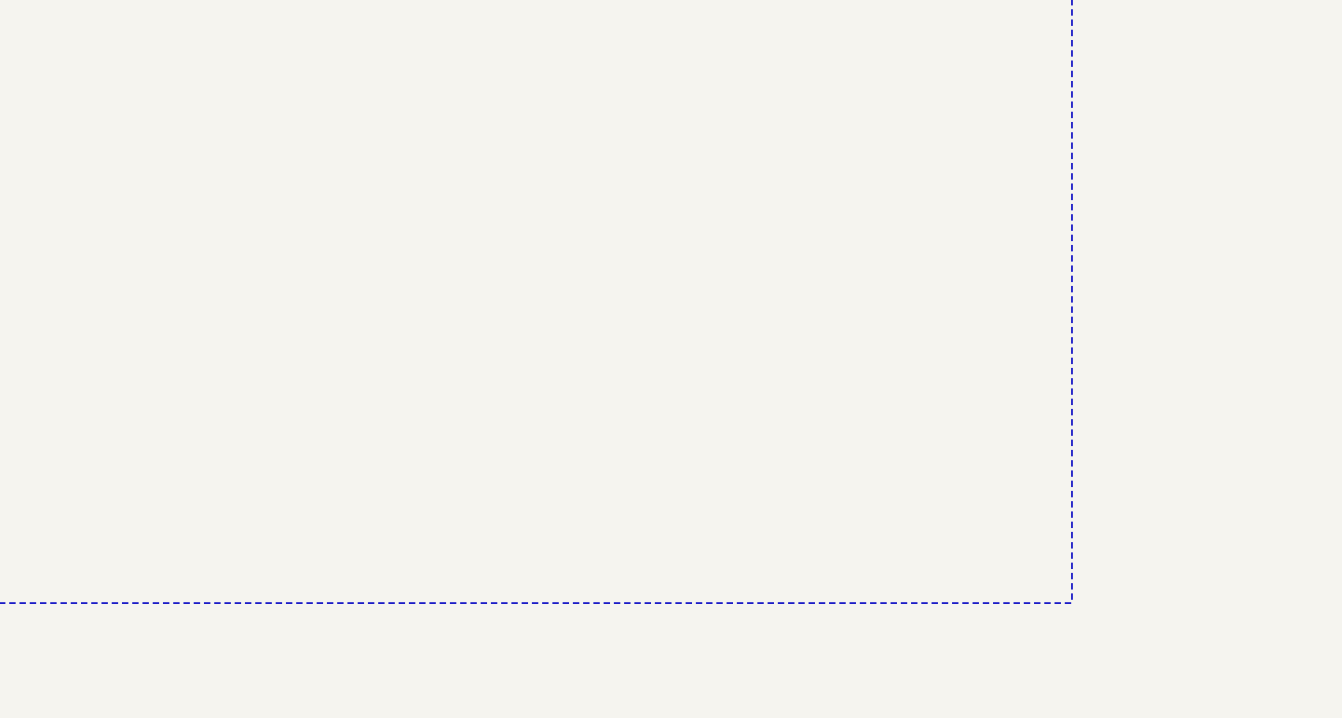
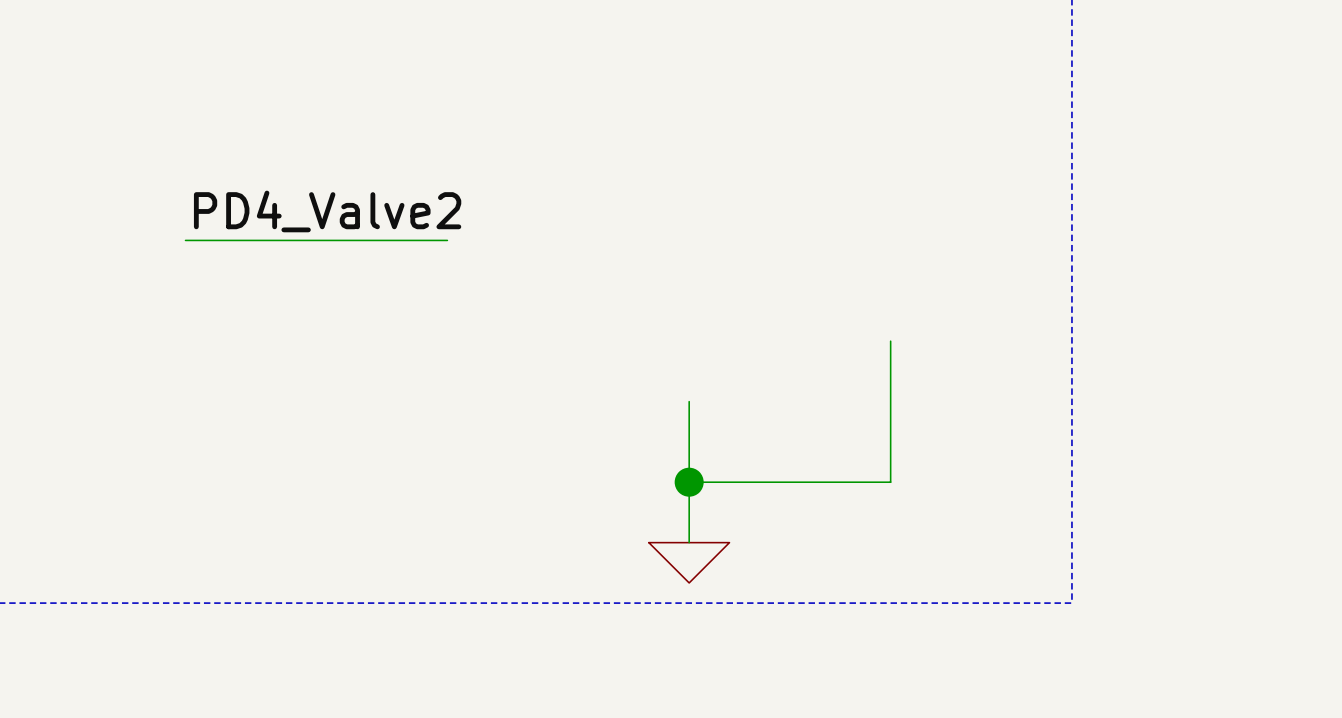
label: none -> PD4_Valve2 (327, 211)
wire: none -> (185, 240) (447, 240)
wire: none -> (890, 341) (890, 482) (689, 482)
wire: none -> (689, 401) (689, 542)
junction: none -> (689, 482)
power symbol: none -> (689, 562)

